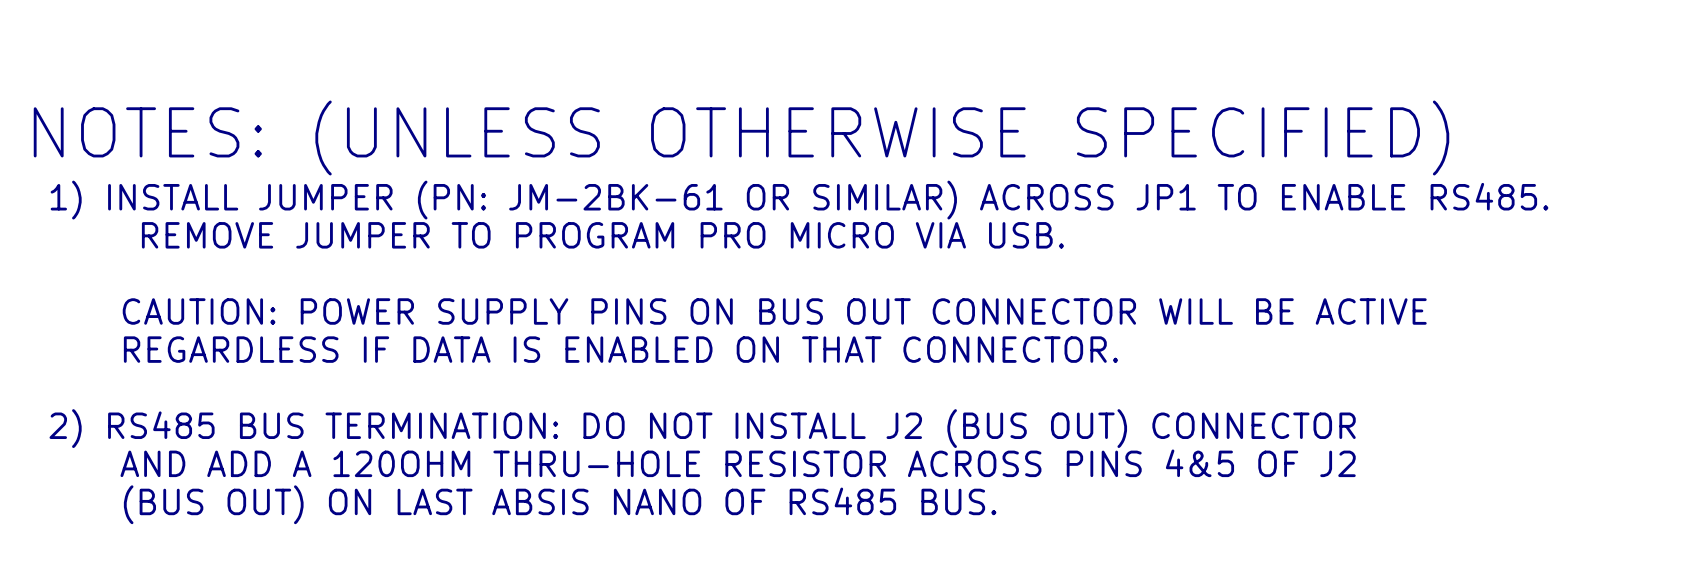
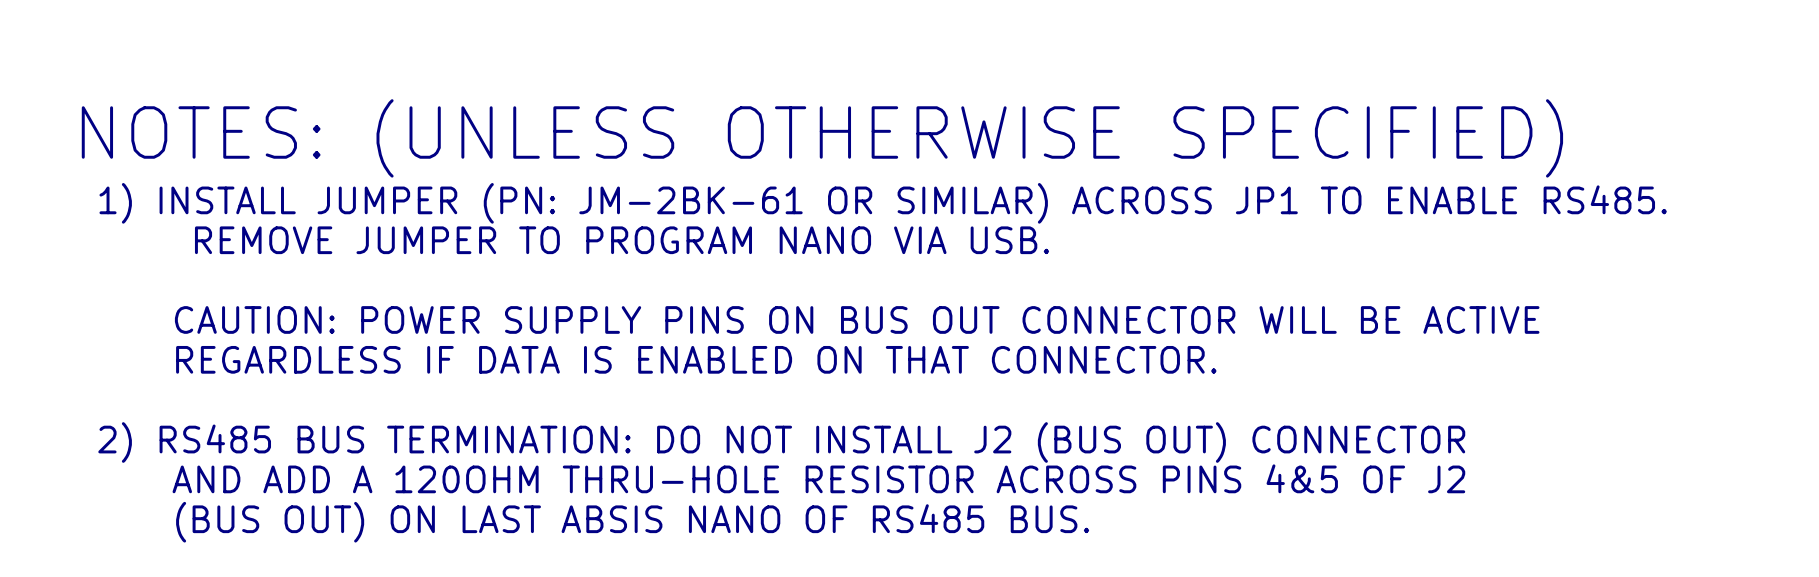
text: REMOVE JUMPER TO PROGRAM PRO MICRO VIA USB. (602, 235) -> REMOVE JUMPER TO PROGRAM NANO VIA USB. (622, 240)

